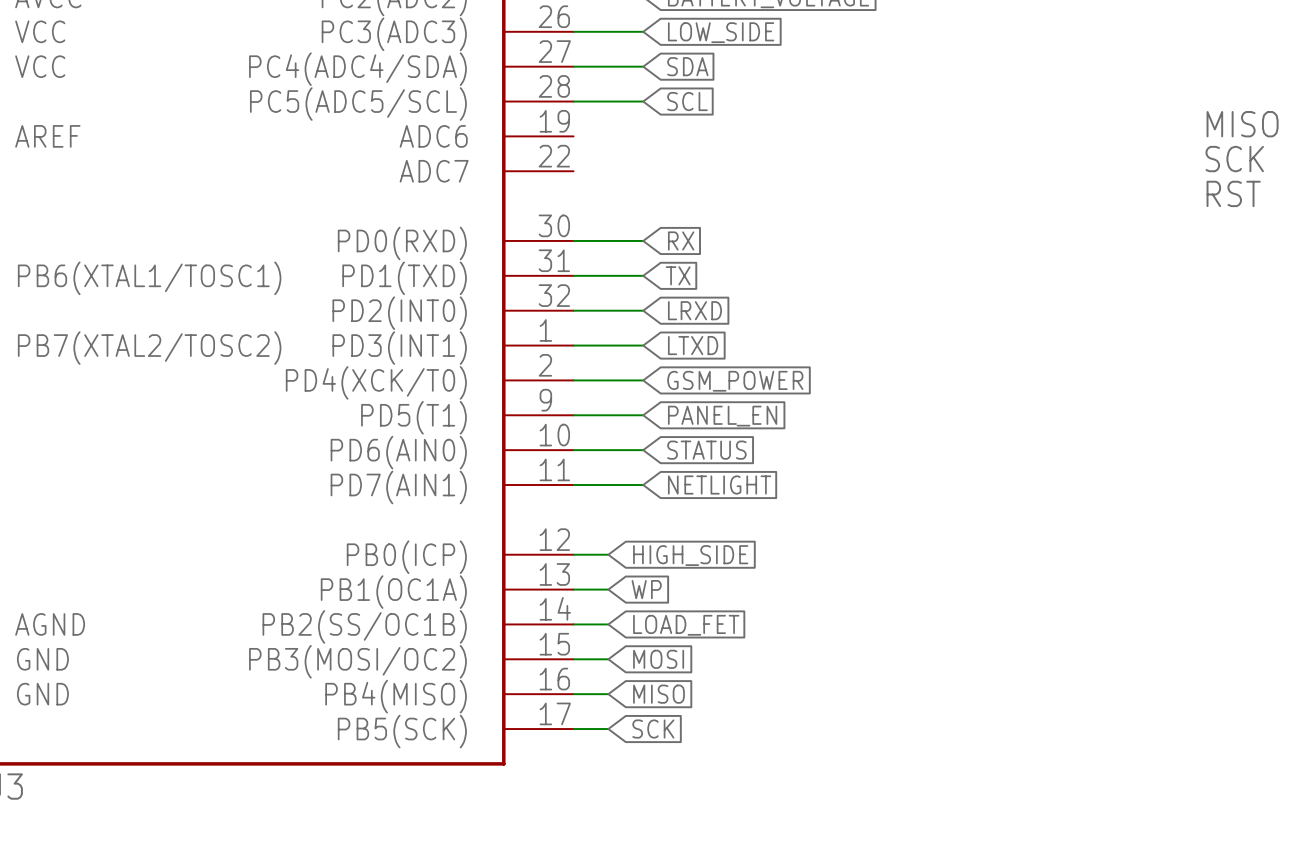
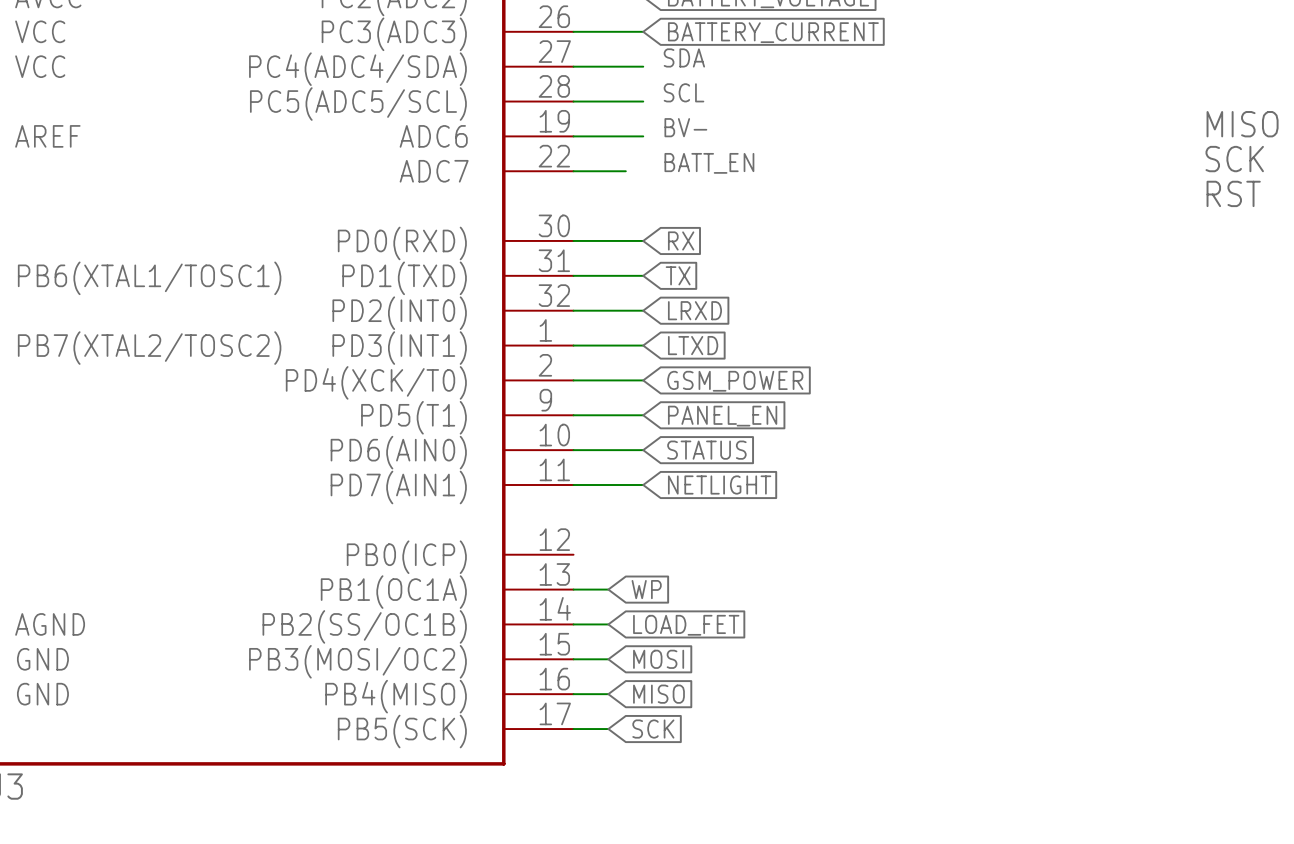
global label: LOW_SIDE (721, 32) -> BATTERY_CURRENT (773, 32)
label: none -> SDA (684, 57)
global label: SDA (687, 66) -> none
label: none -> SCL (684, 92)
global label: SCL (687, 101) -> none
label: none -> BV- (685, 127)
wire: none -> (573, 136) (643, 136)
label: none -> BATT_EN (709, 163)
wire: none -> (573, 171) (625, 171)
wire: (573, 554) (608, 554) -> none
global label: HIGH_SIDE (690, 555) -> none

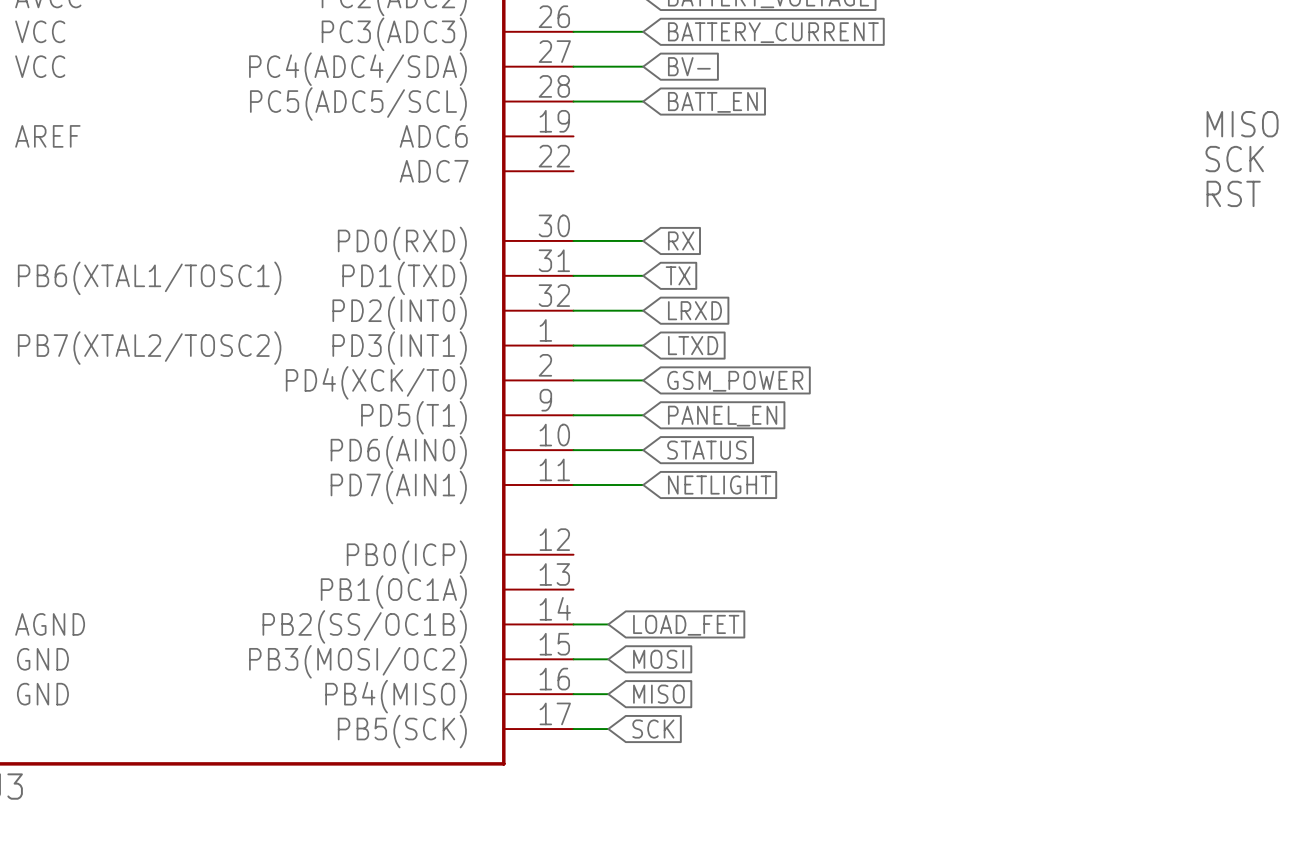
label: SDA (684, 57) -> none
global label: none -> BV- (689, 66)
label: SCL (684, 92) -> none
global label: none -> BATT_EN (712, 102)
label: BV- (685, 127) -> none
wire: (573, 136) (643, 136) -> none
label: BATT_EN (709, 163) -> none
wire: (573, 171) (625, 171) -> none
wire: (573, 589) (608, 589) -> none
global label: WP (646, 589) -> none

